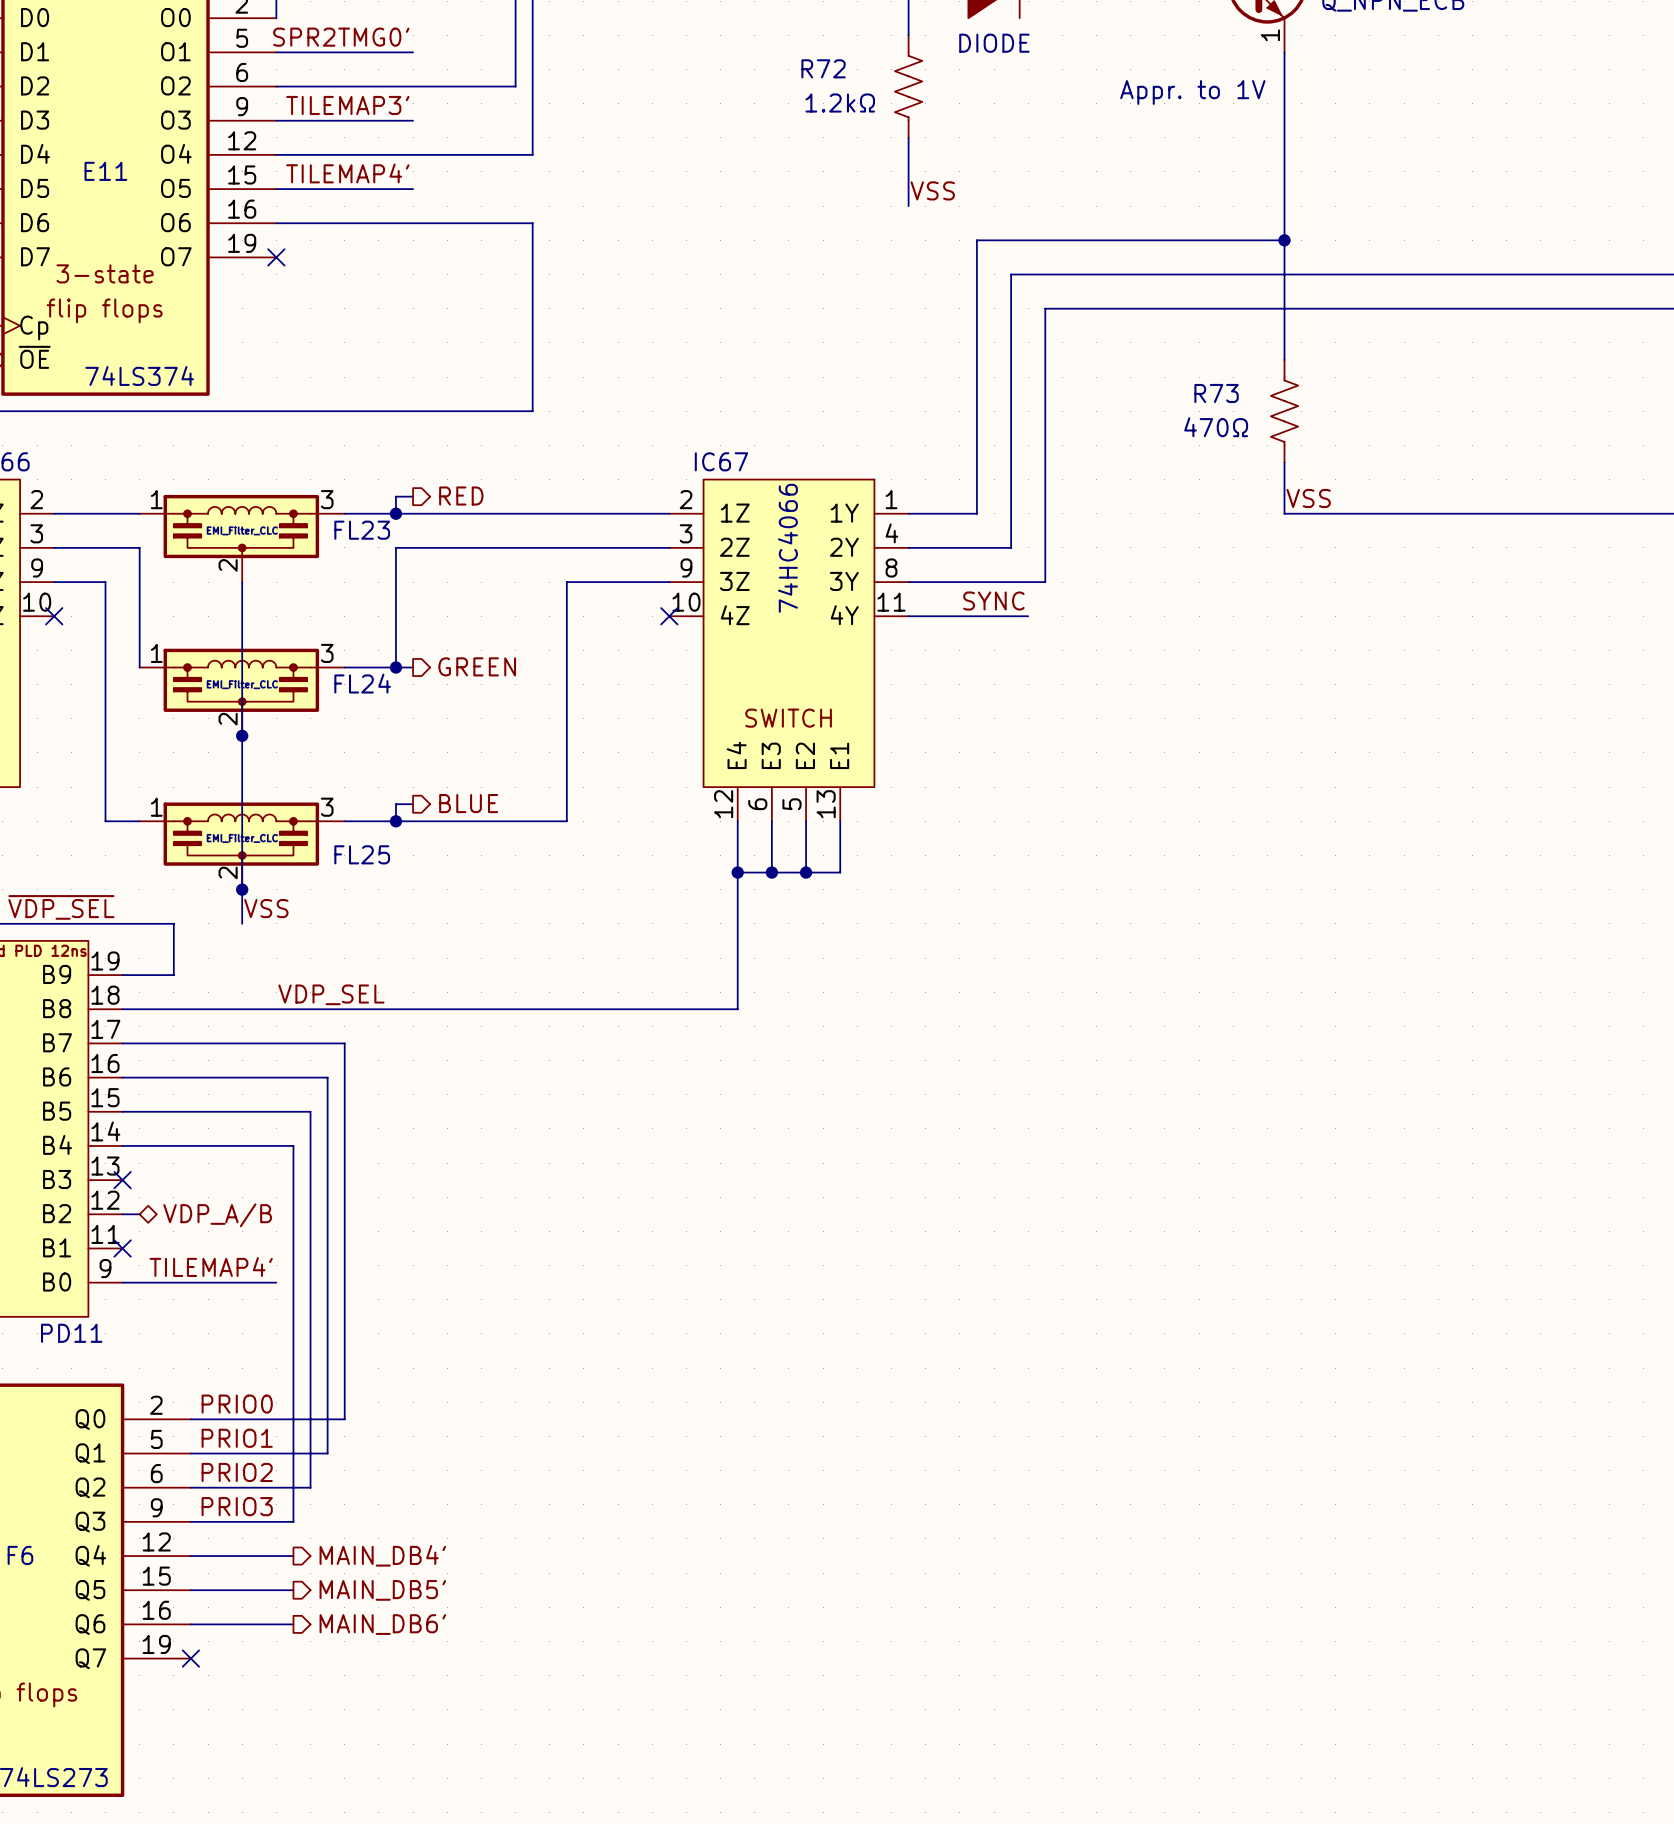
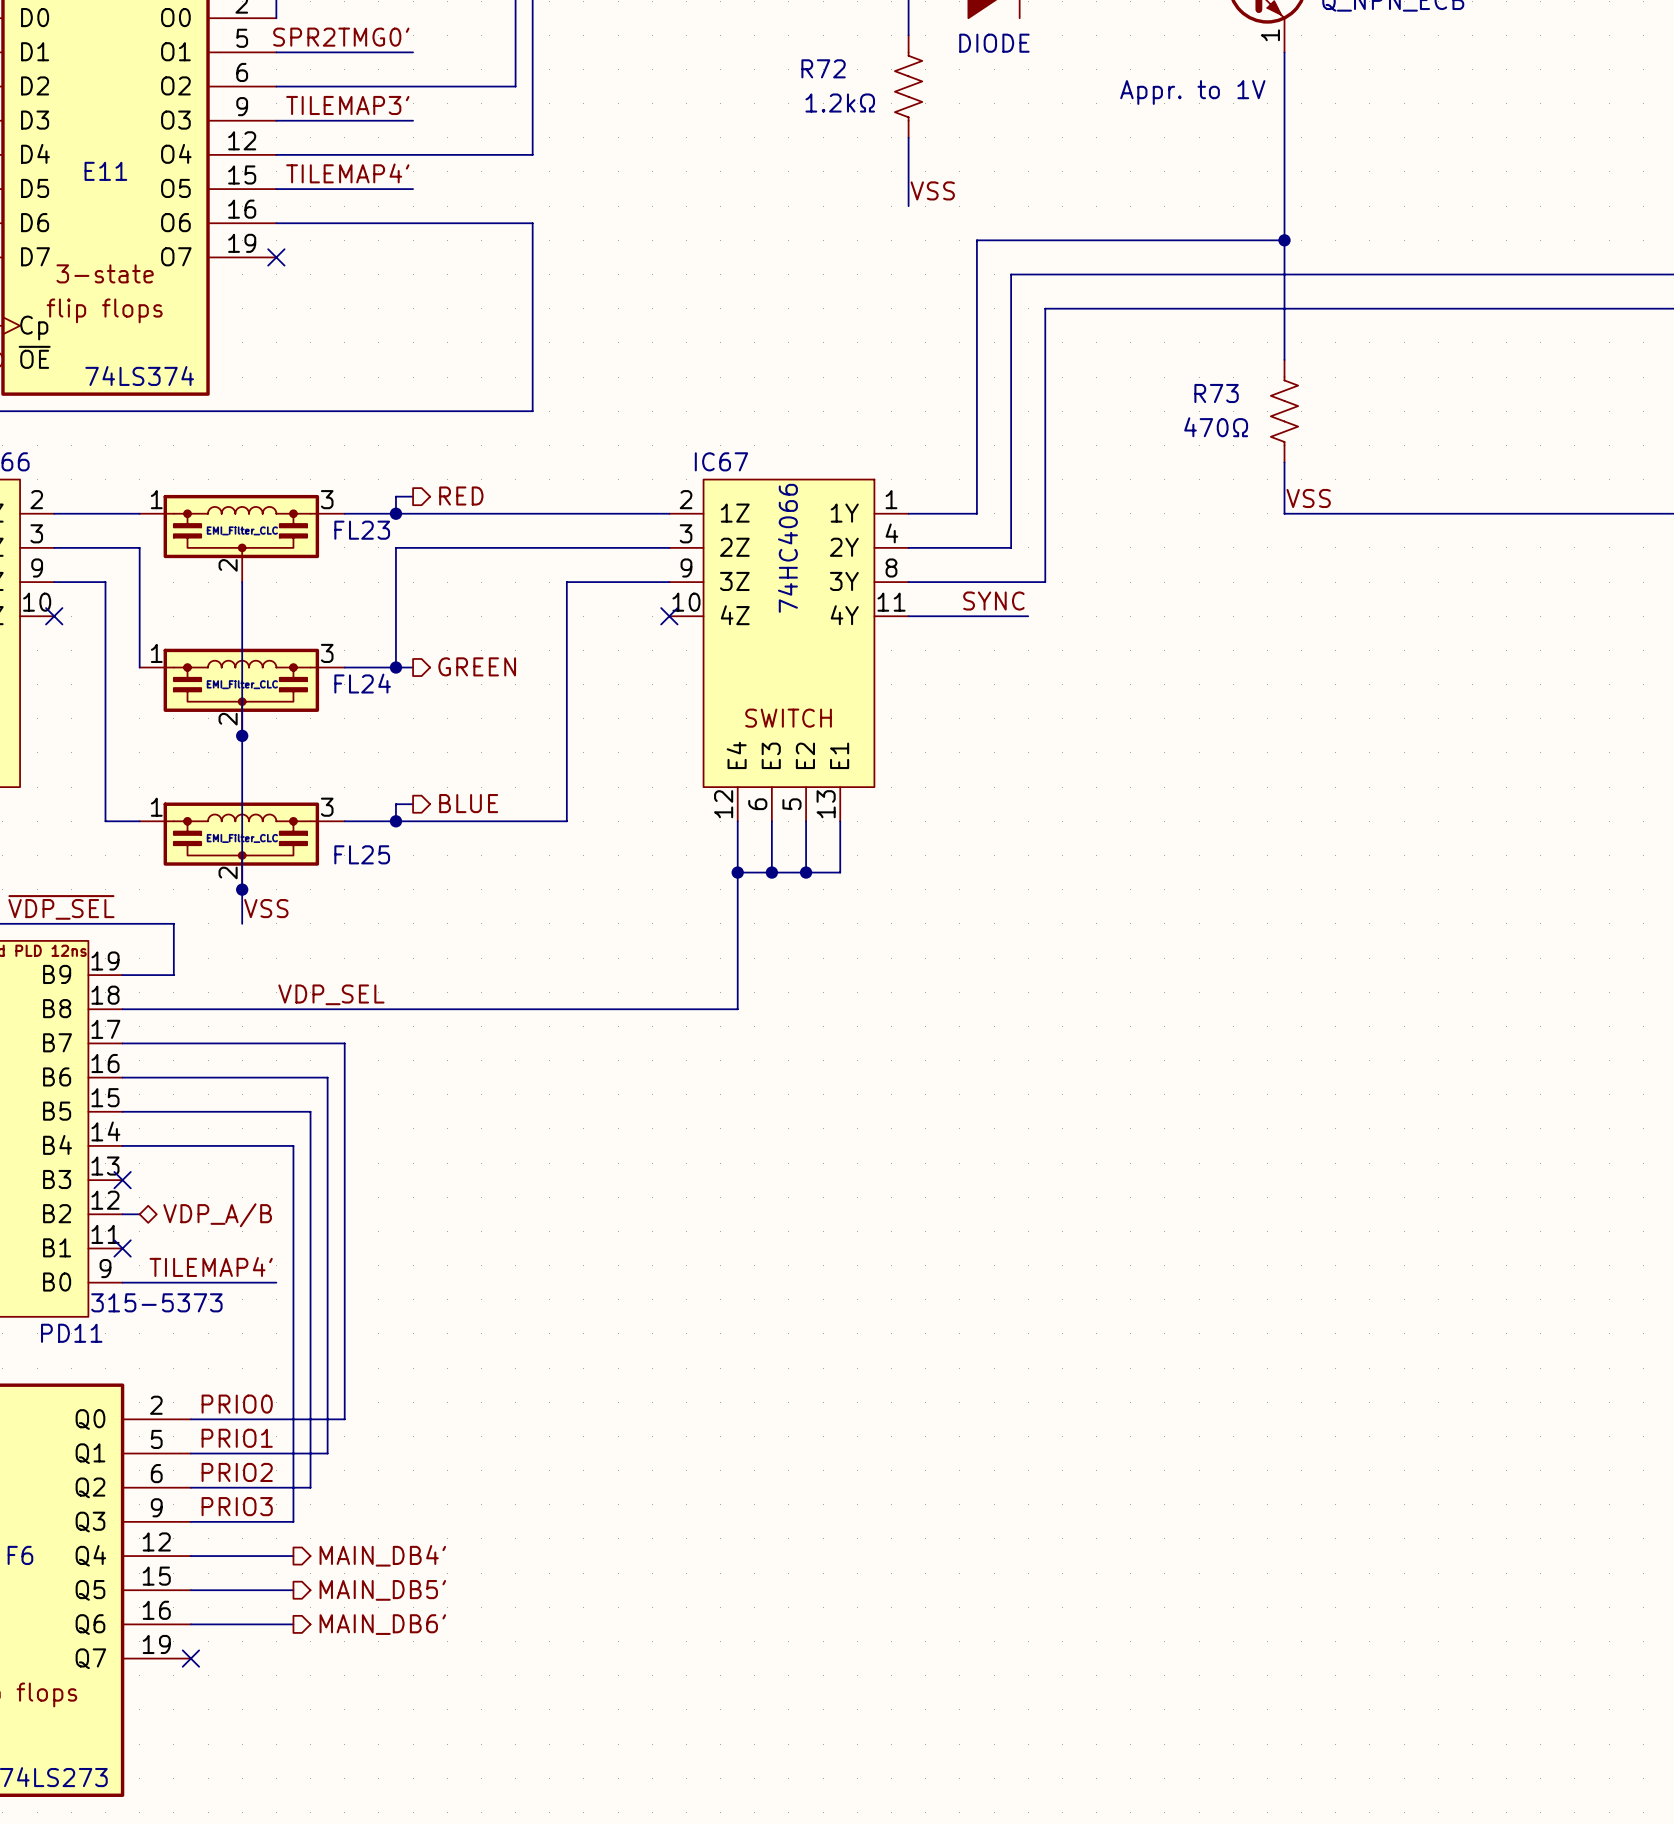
text: none -> 315-5373 (156, 1302)

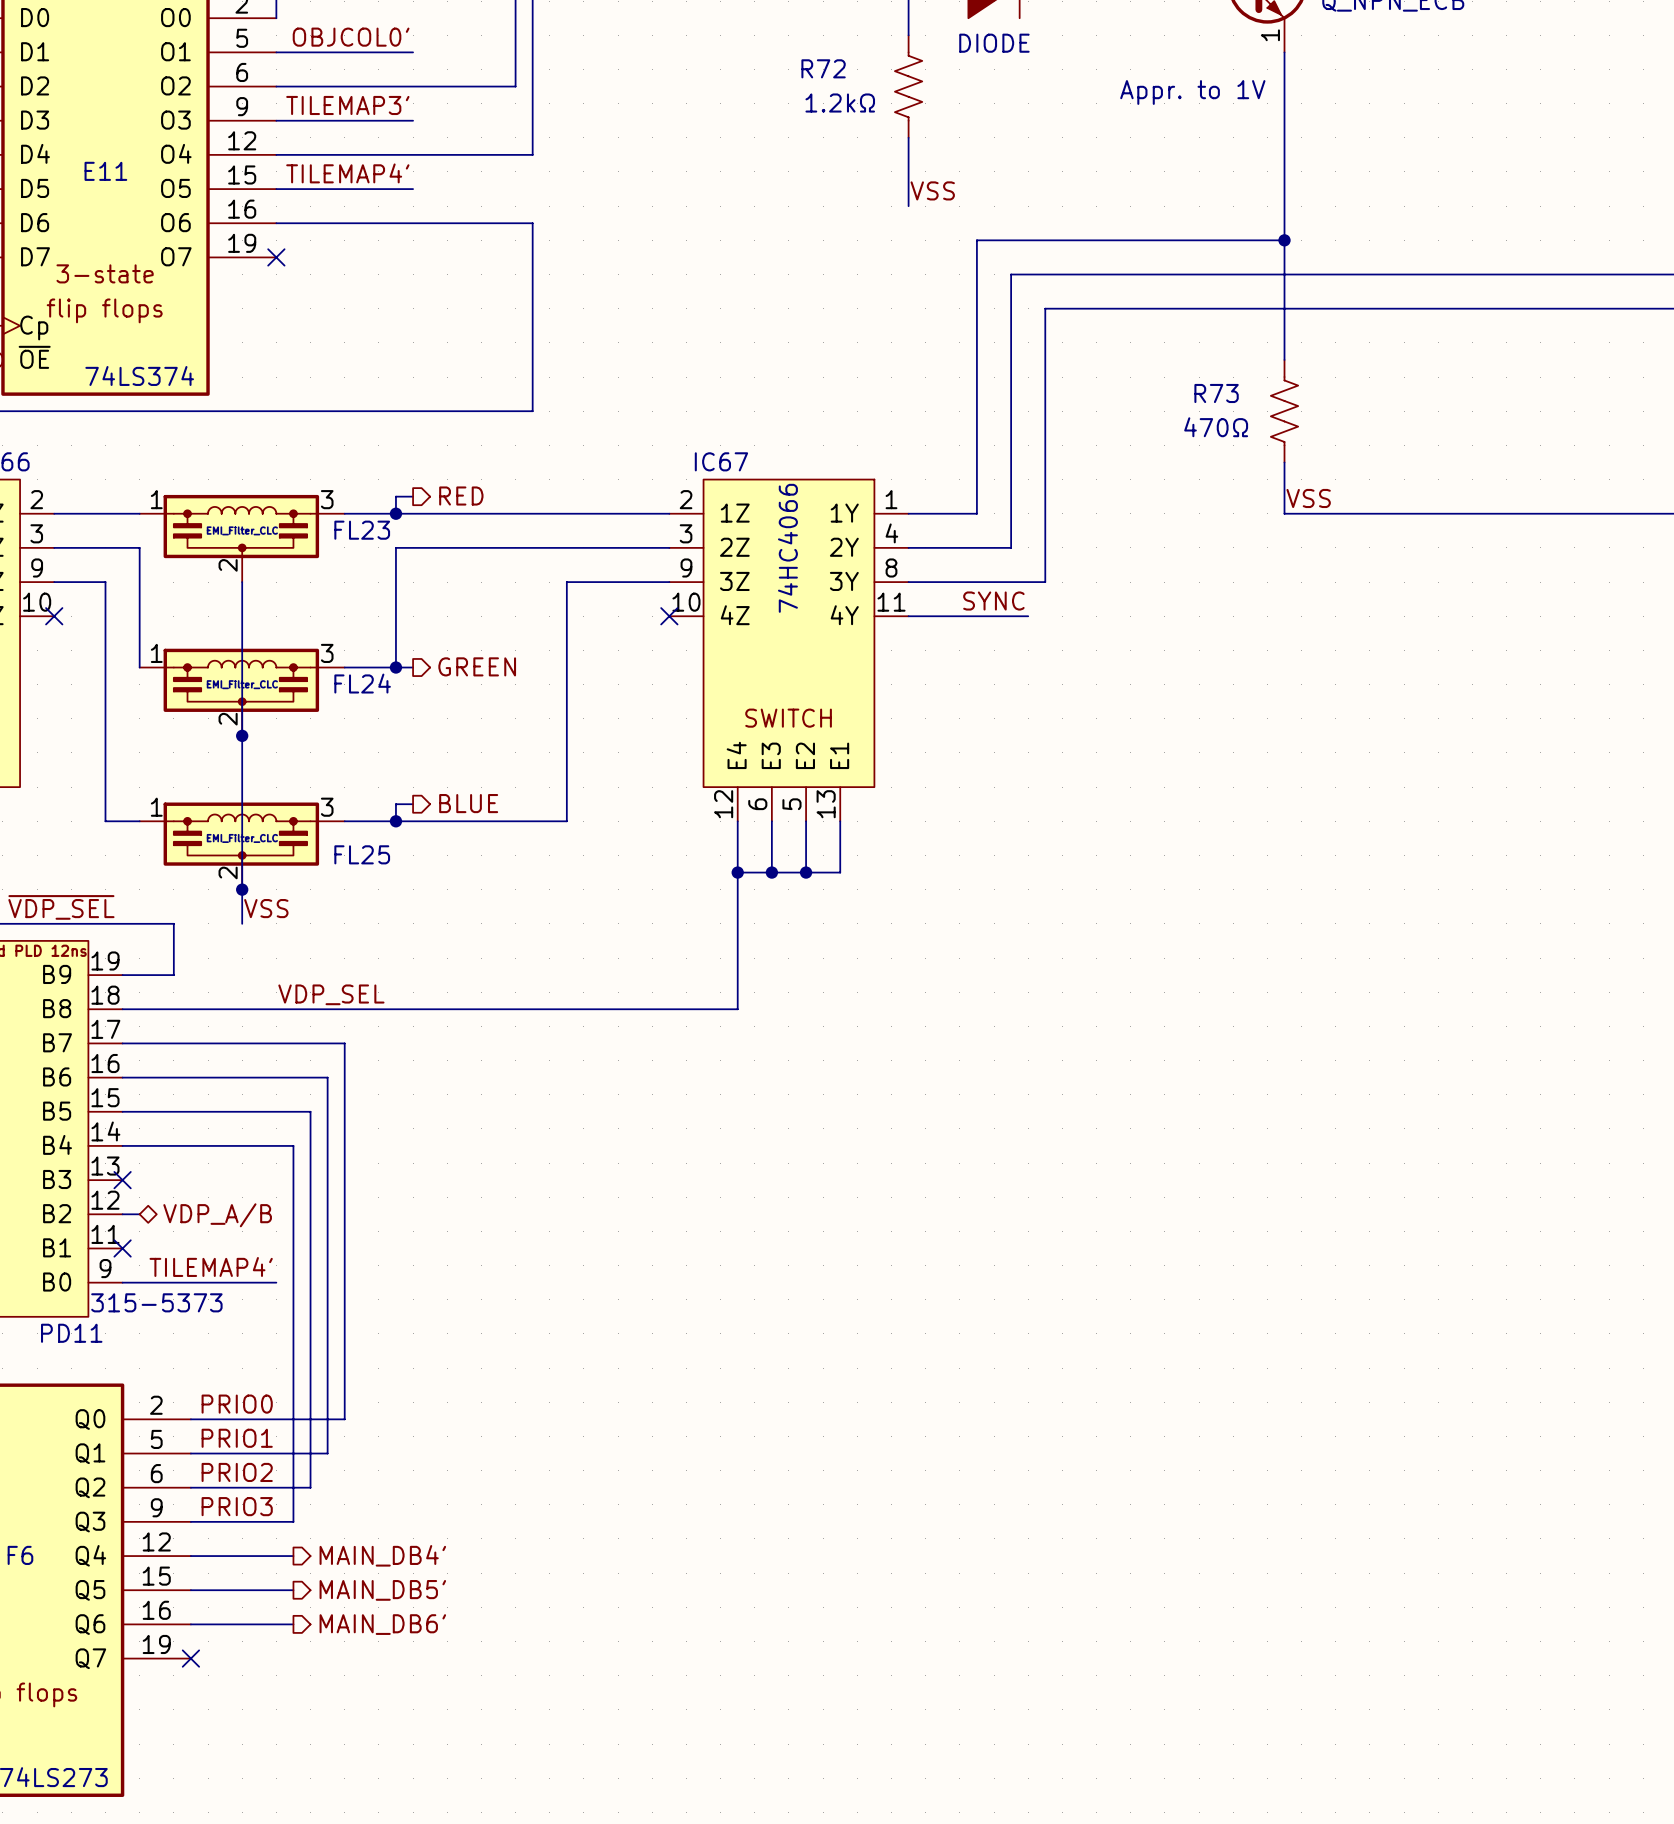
label: SPR2TMG0' (341, 37) -> OBJCOL0' (351, 37)

